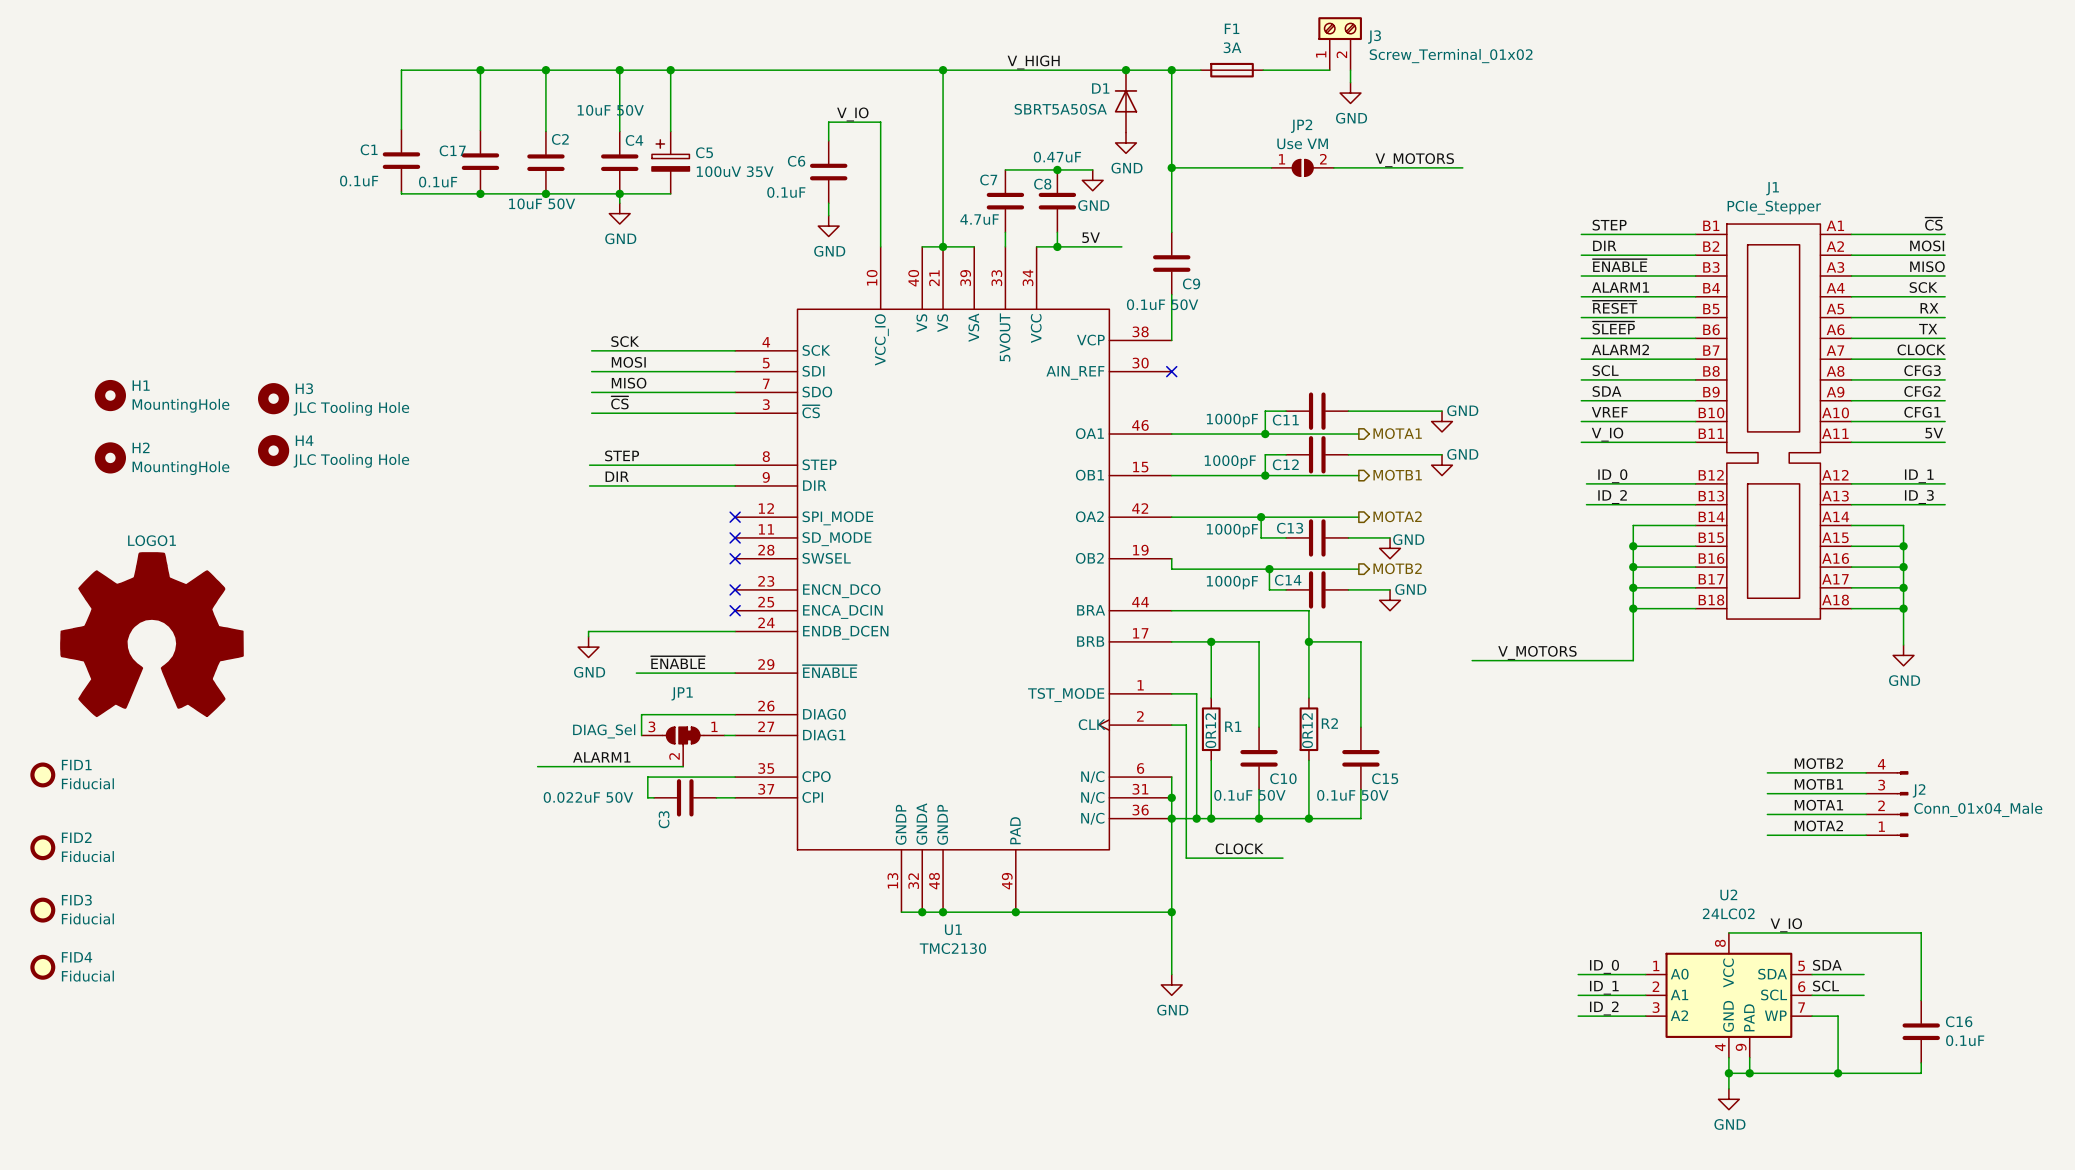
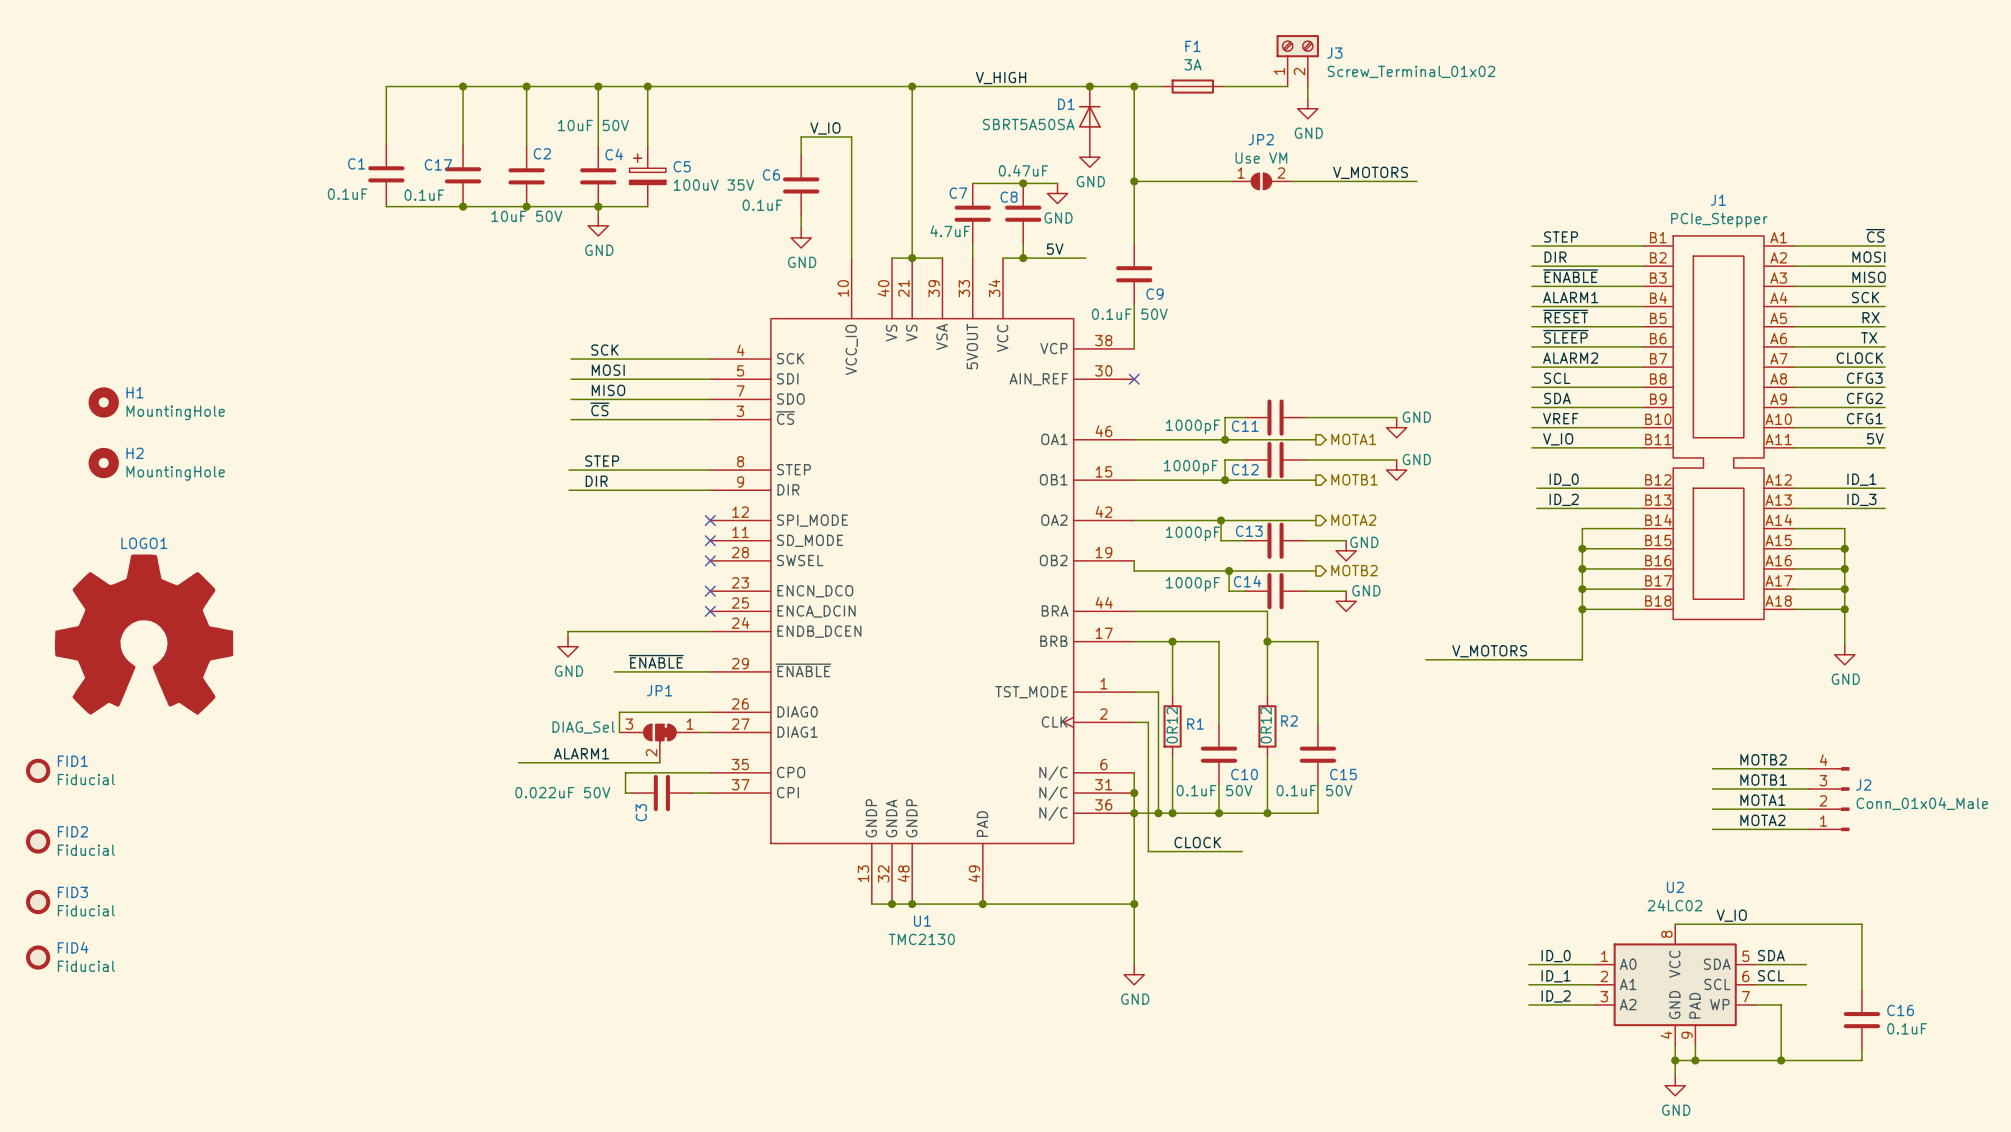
H3: JLC Tooling Hole (273, 398) -> none
H4: JLC Tooling Hole (273, 450) -> none

